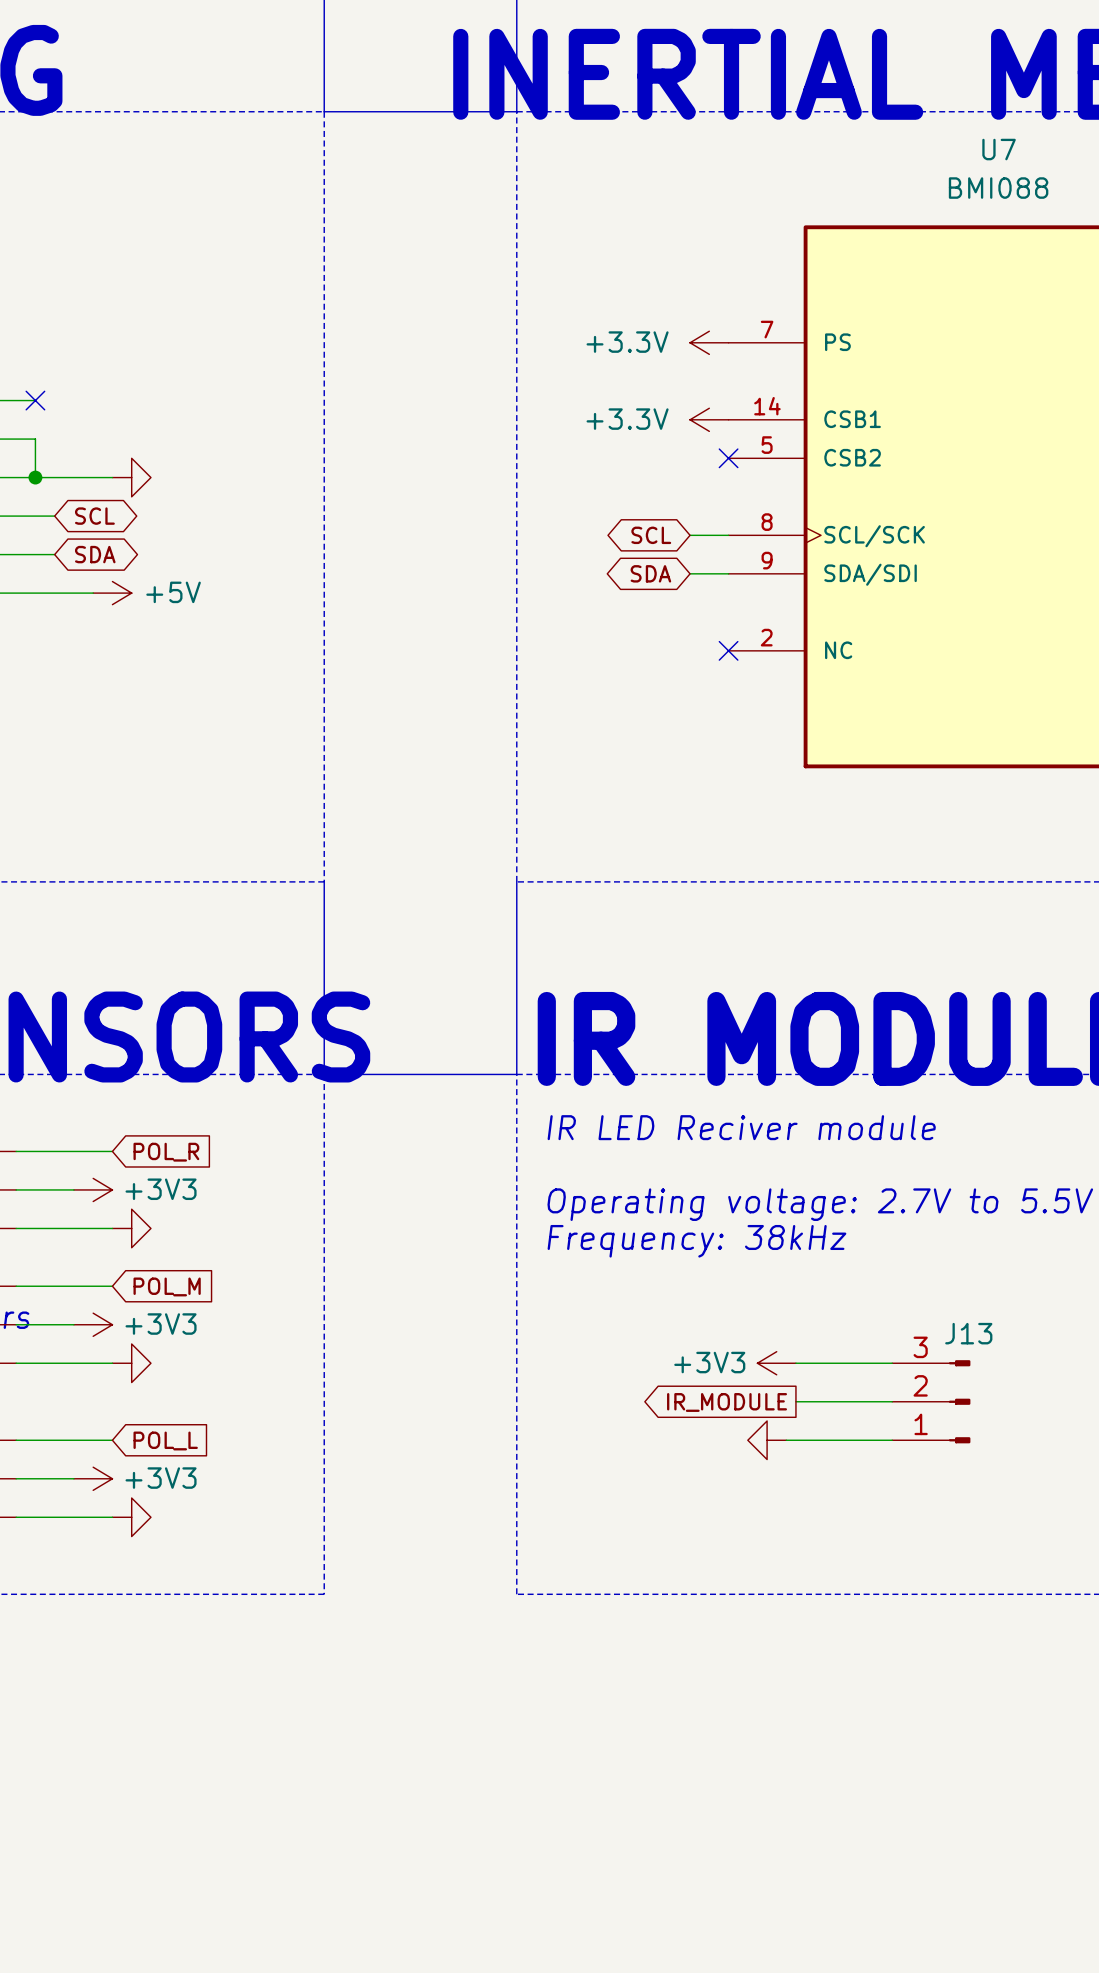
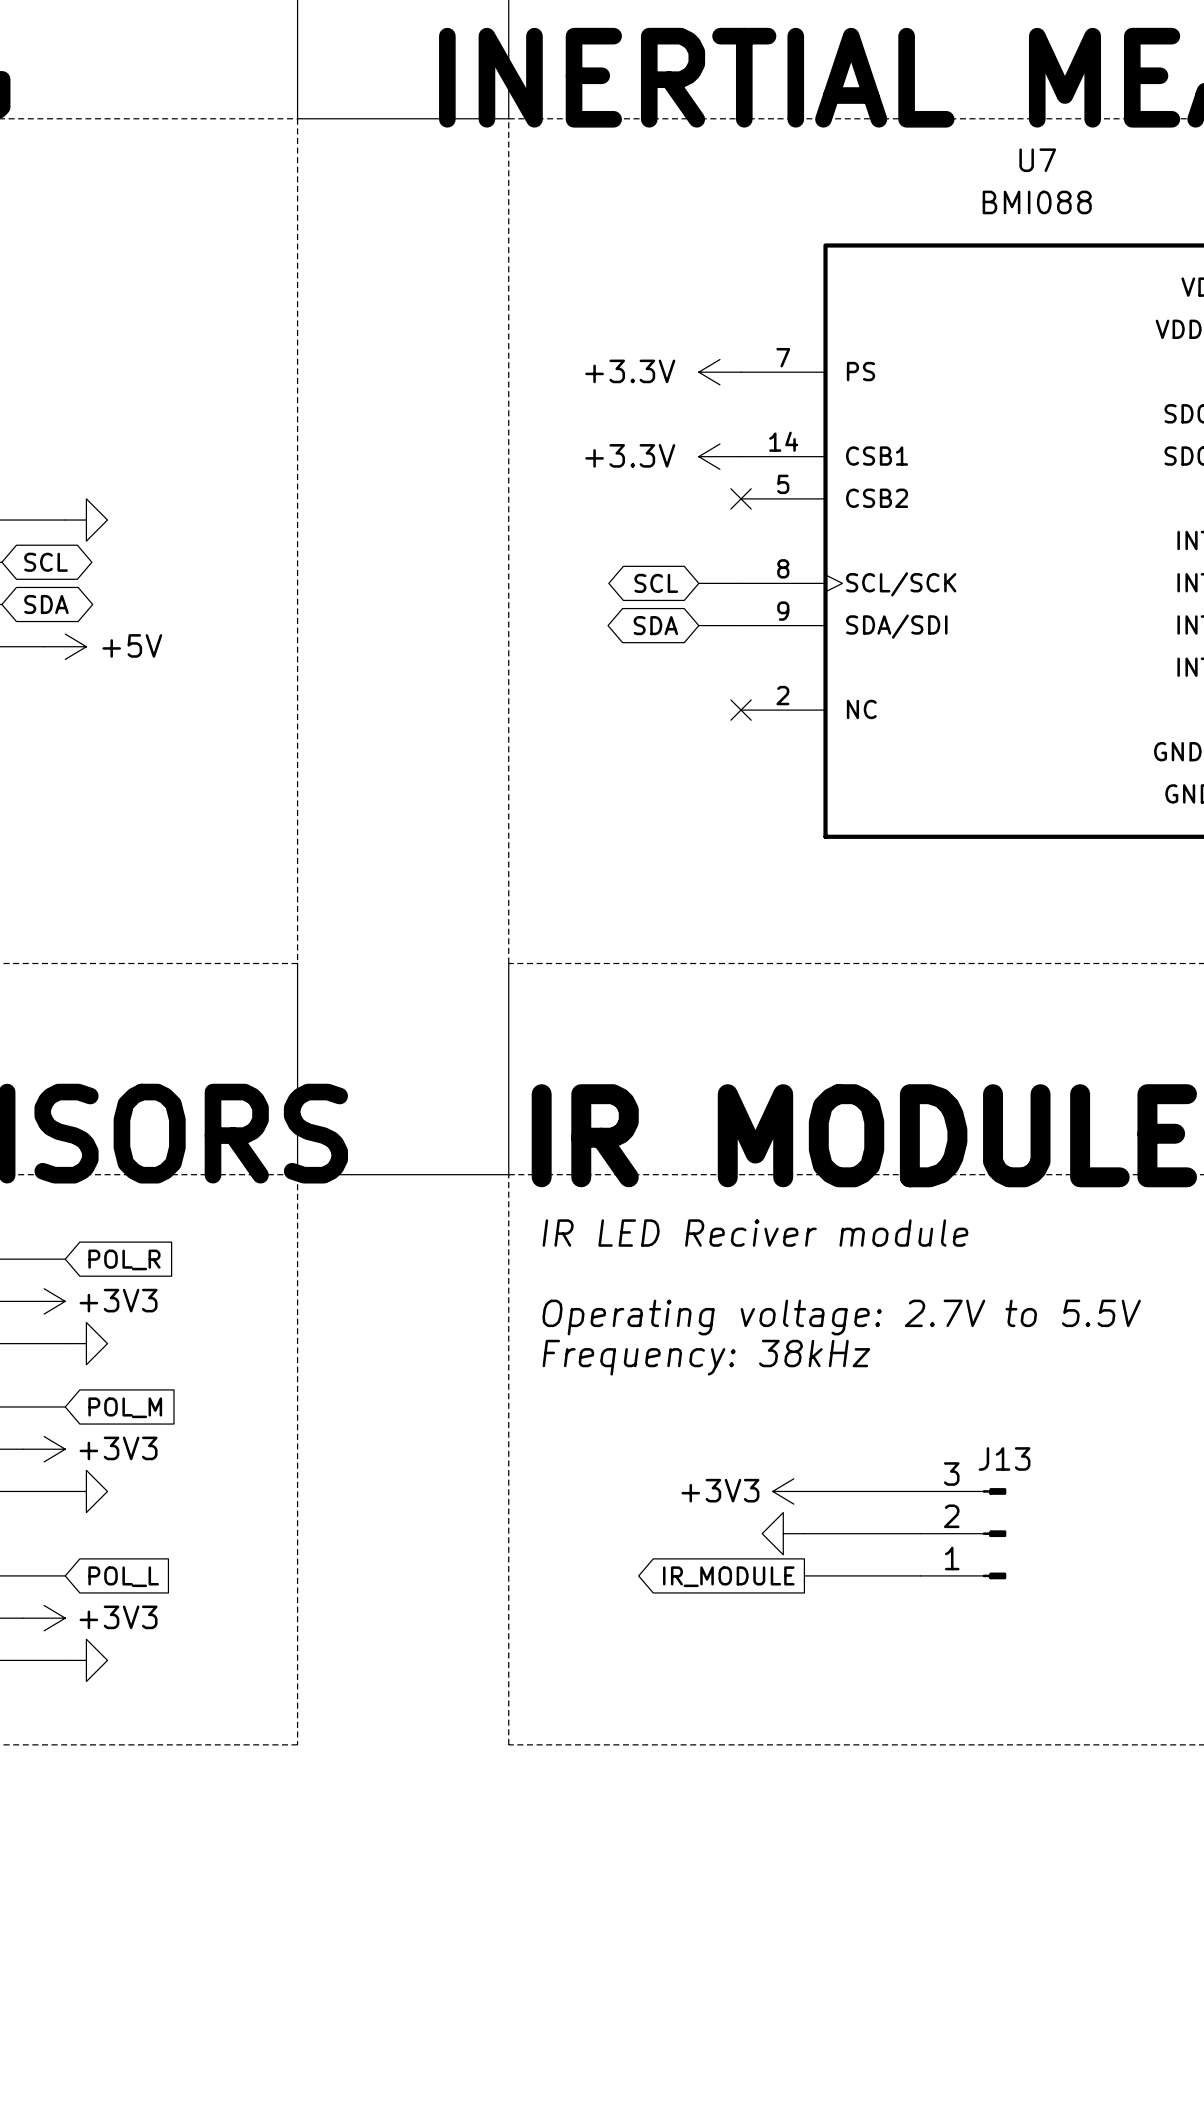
wire: none -> (804, 1533) (814, 1533)
global label position: IR_MODULE (727, 1402) -> IR_MODULE (728, 1576)
power symbol position: (767, 1440) -> (783, 1533)

